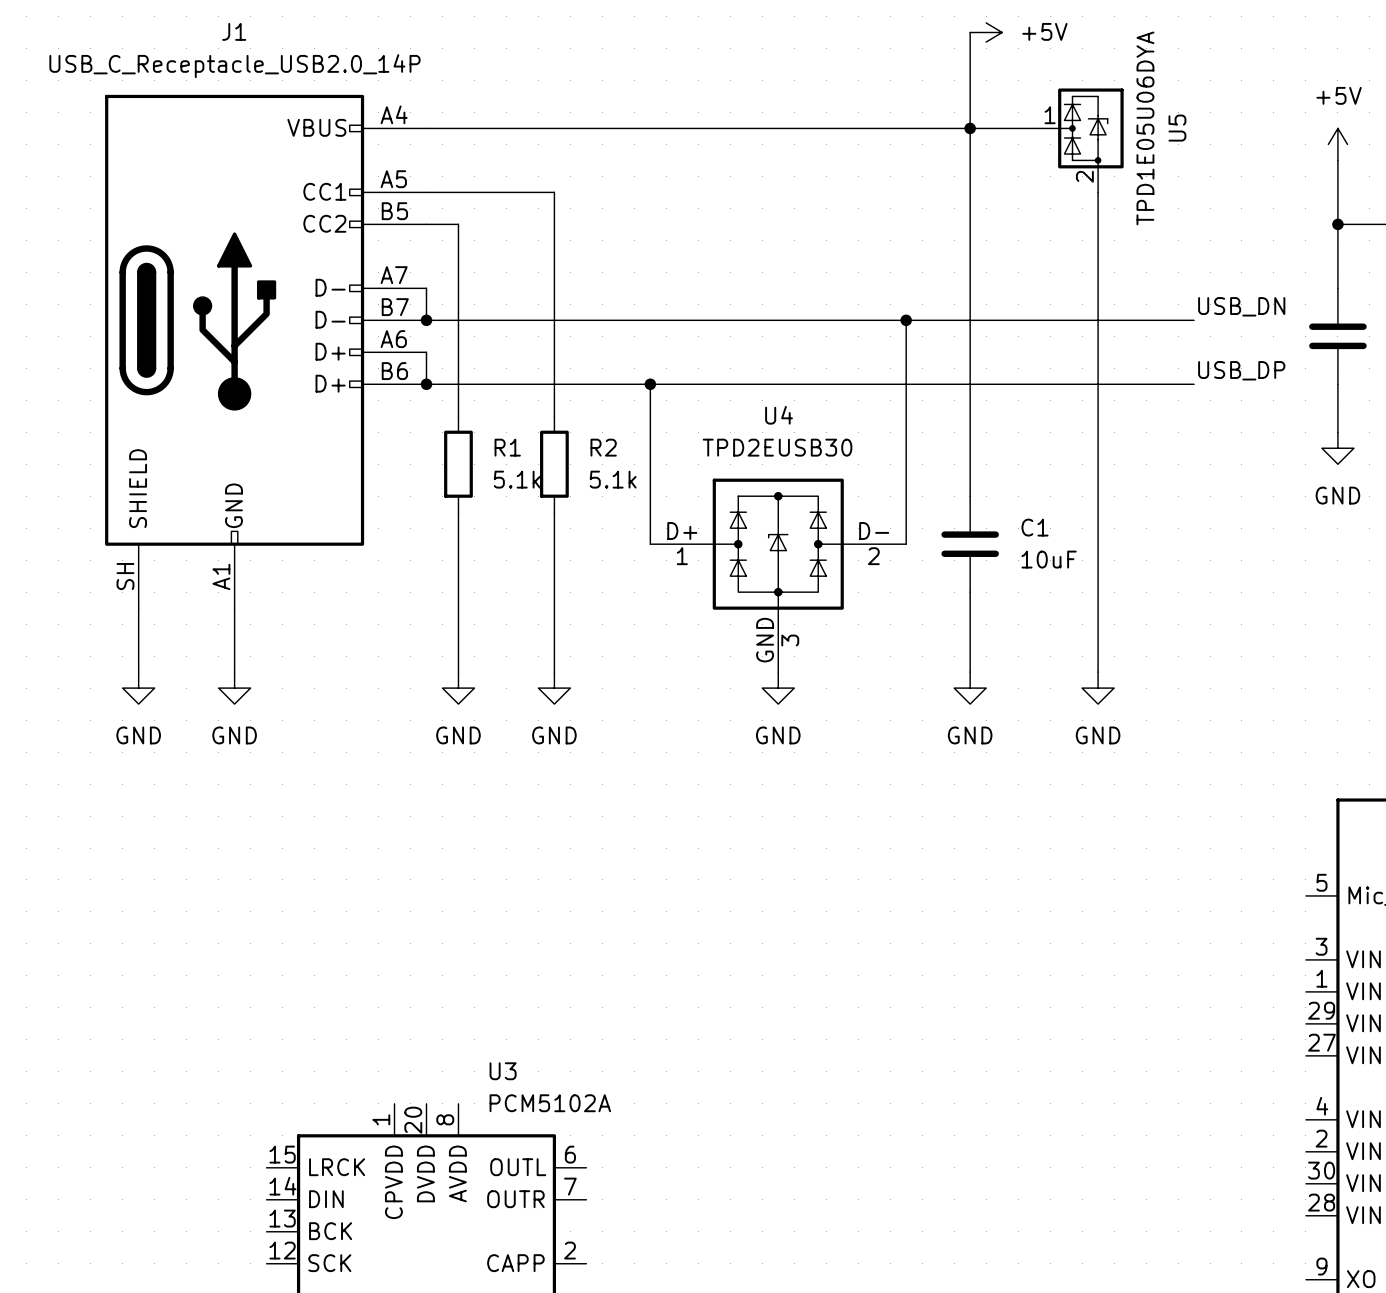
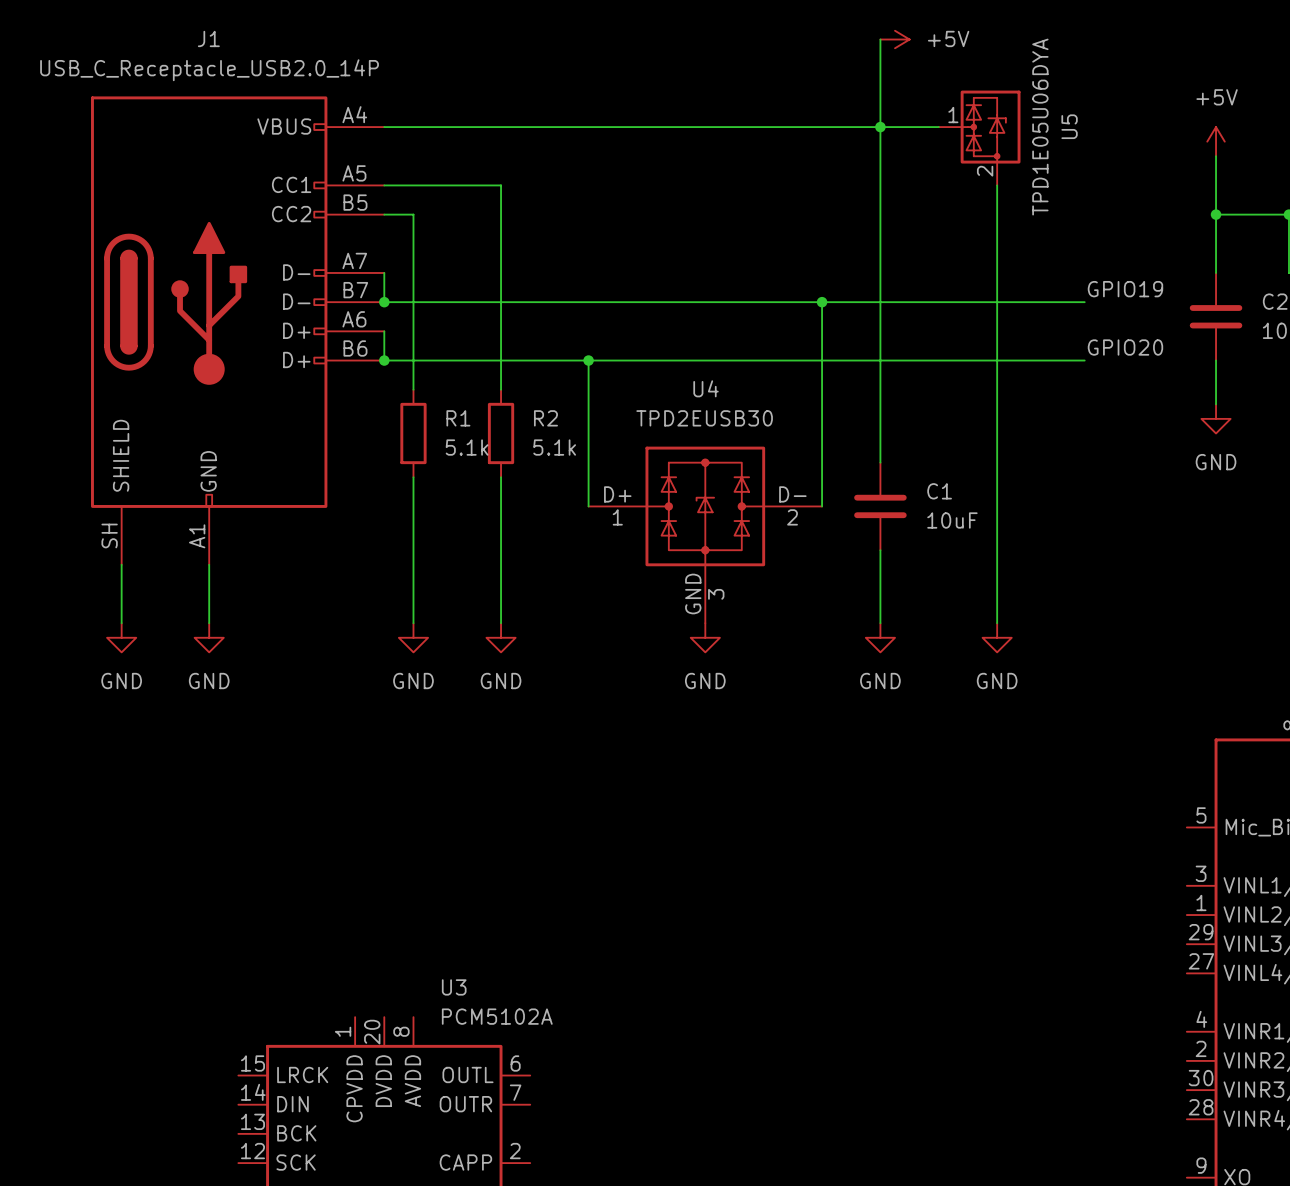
label: USB_DN (1241, 306) -> GPIO19 (1125, 289)
label: USB_DP (1241, 370) -> GPIO20 (1125, 347)

